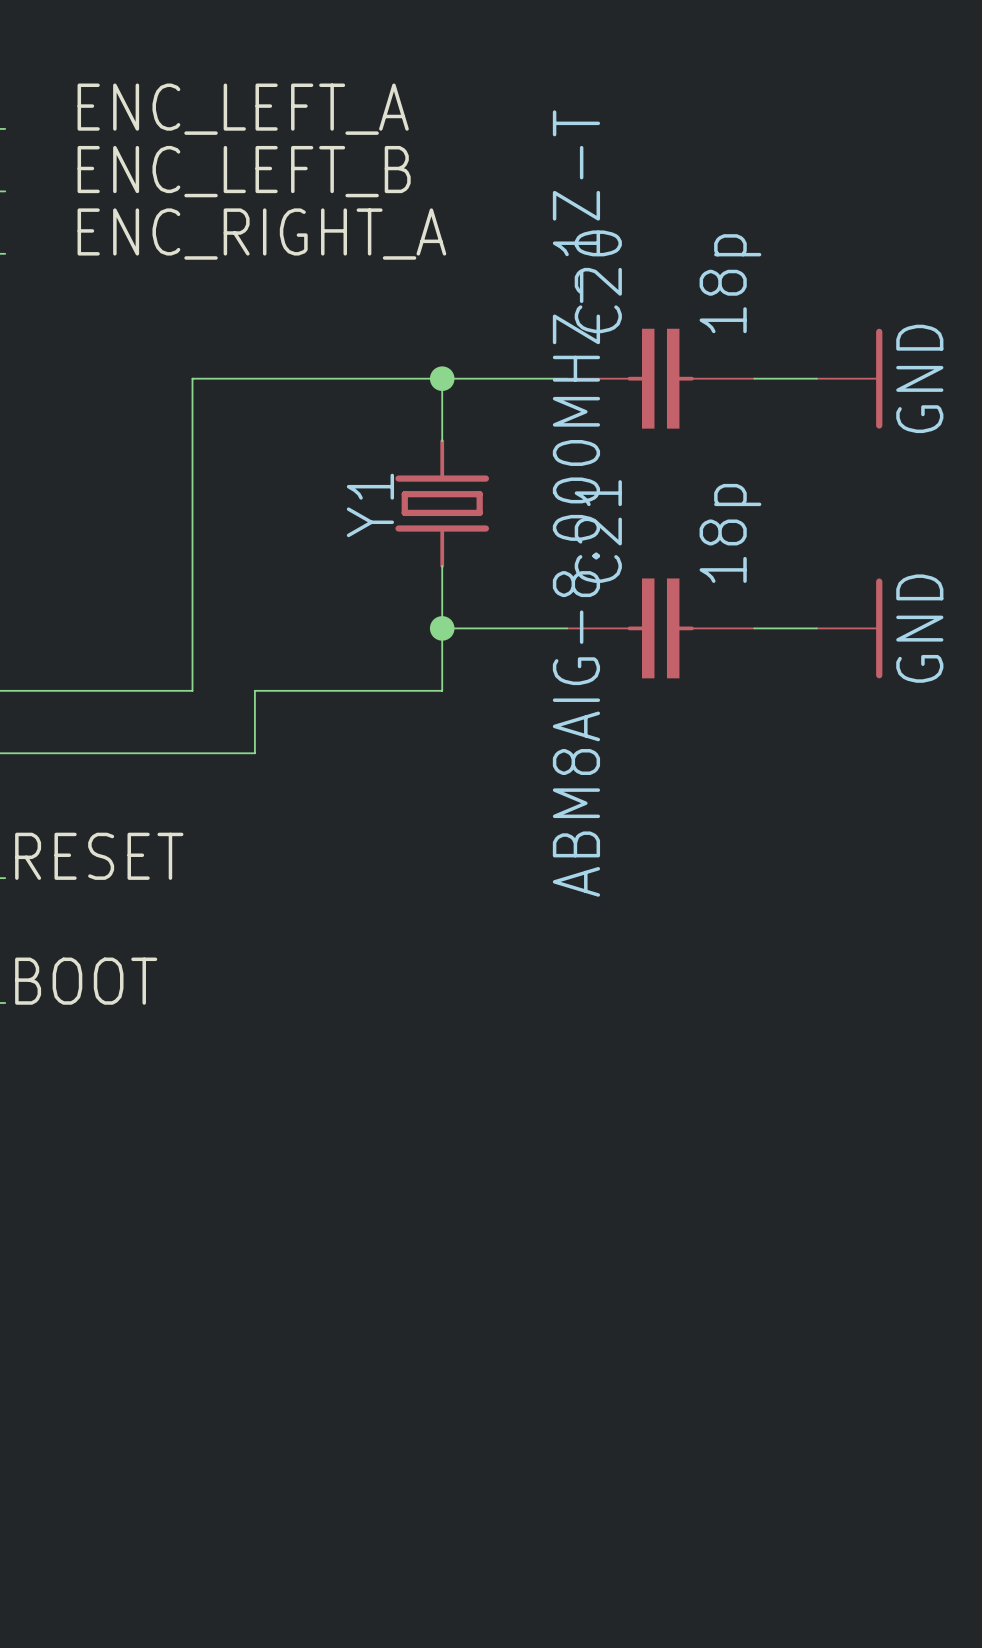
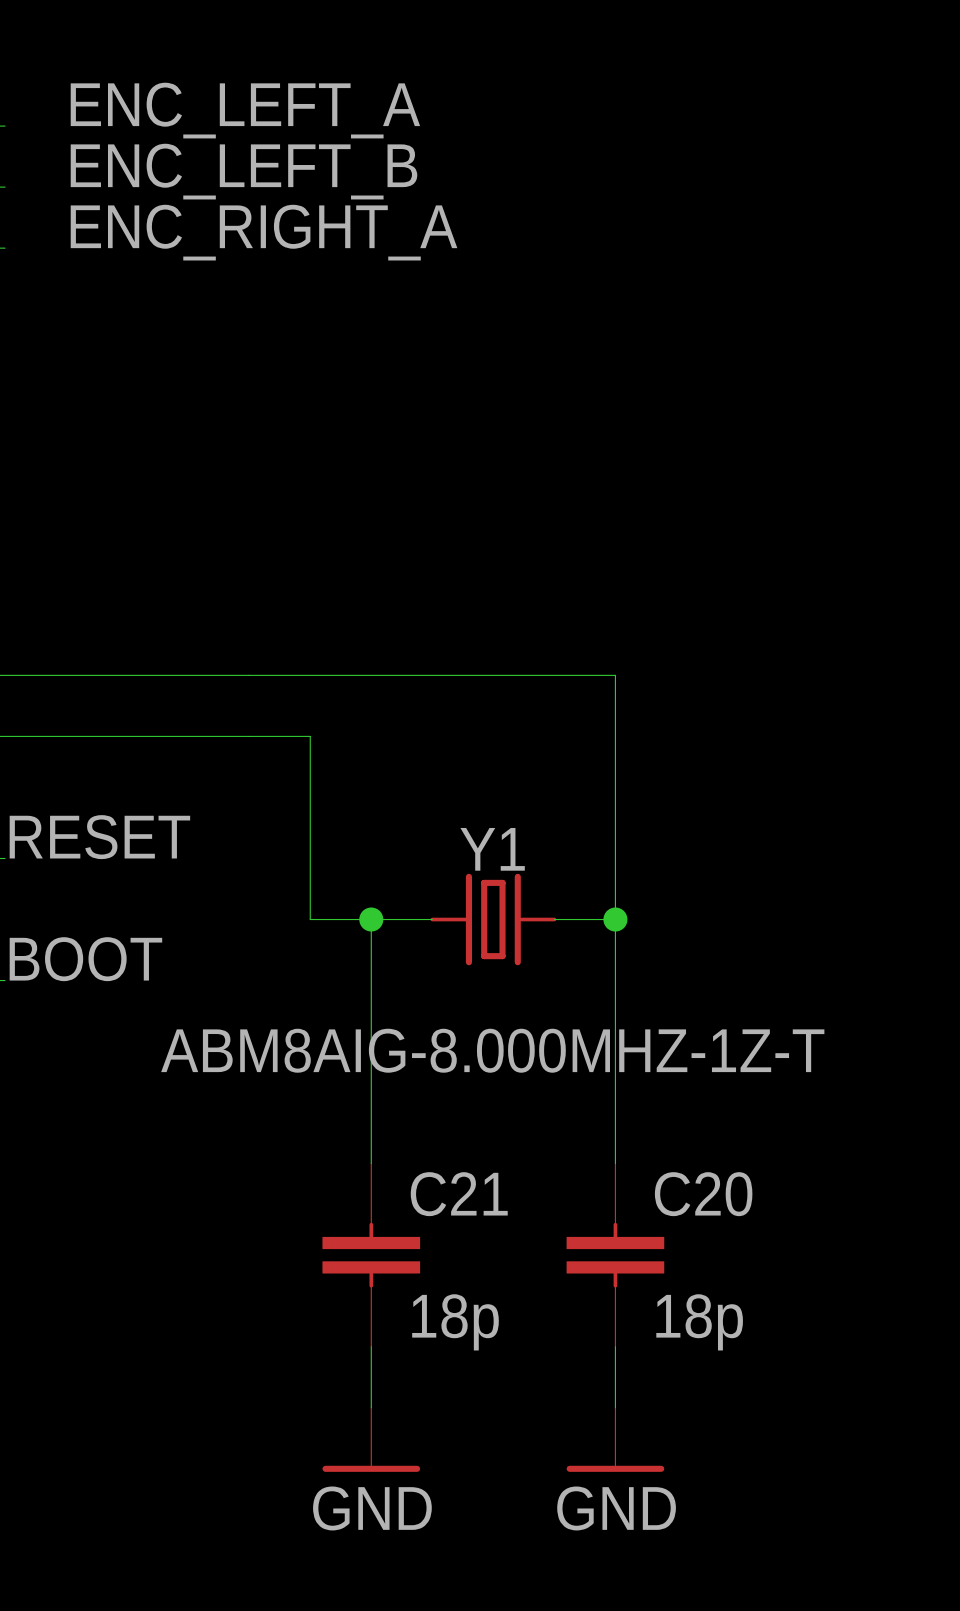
wire: (442, 378) (442, 441) -> none
junction: (442, 378) -> none
wire: (567, 378) (192, 378) (192, 690) -> none
C20 rotation: 0° (660, 378) -> 90° clockwise (615, 1255)
C20 position: (660, 378) -> (615, 1255)
wire: (754, 378) (816, 378) -> none
power symbol: GND (849, 378) -> none
Y1 rotation: 0° (442, 503) -> 90° clockwise (493, 919)
Y1 position: (442, 503) -> (493, 919)
wire: (442, 565) (442, 690) -> (615, 1163) (615, 675) (432, 675)
wire: (442, 628) (567, 628) -> none
junction: (442, 628) -> none
C21 rotation: 0° (660, 628) -> 90° clockwise (371, 1255)
C21 position: (660, 628) -> (371, 1255)
wire: (754, 628) (816, 628) -> (554, 919) (615, 919)
power symbol: GND (849, 628) -> none
wire: (254, 690) (254, 753) -> (249, 675) (188, 675)
wire: none -> (249, 736) (310, 736) (310, 919) (432, 919)
wire: none -> (371, 919) (371, 1163)
junction: none -> (371, 919)
junction: none -> (615, 919)
wire: none -> (371, 1346) (371, 1407)
wire: none -> (615, 1346) (615, 1407)
power symbol: none -> GND (371, 1439)
power symbol: none -> GND (615, 1439)

